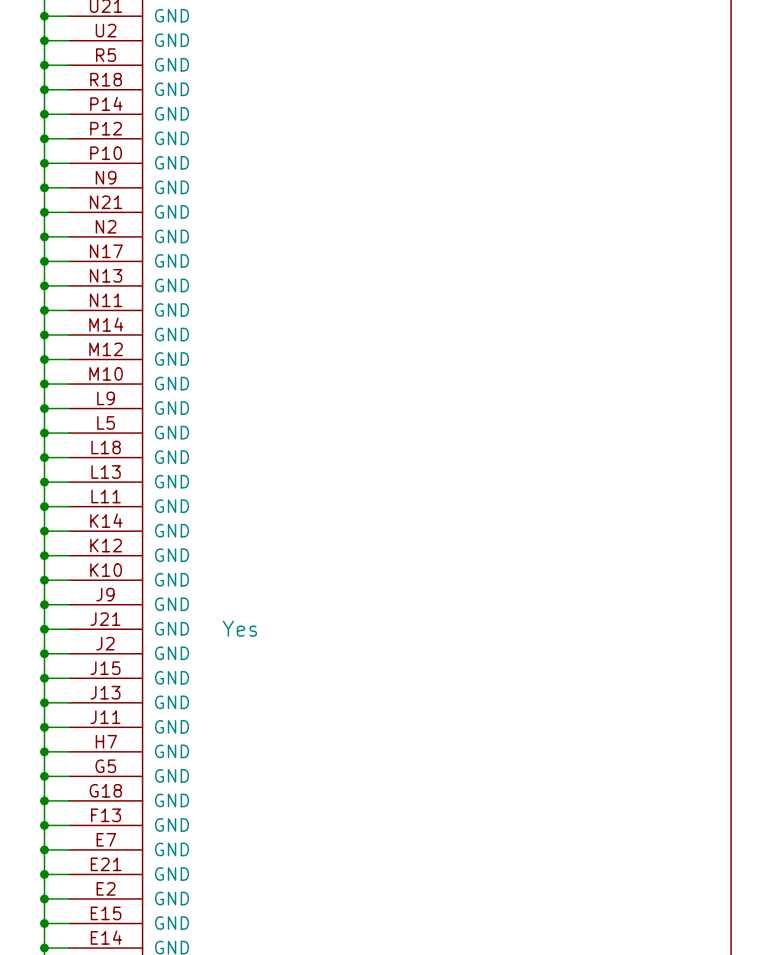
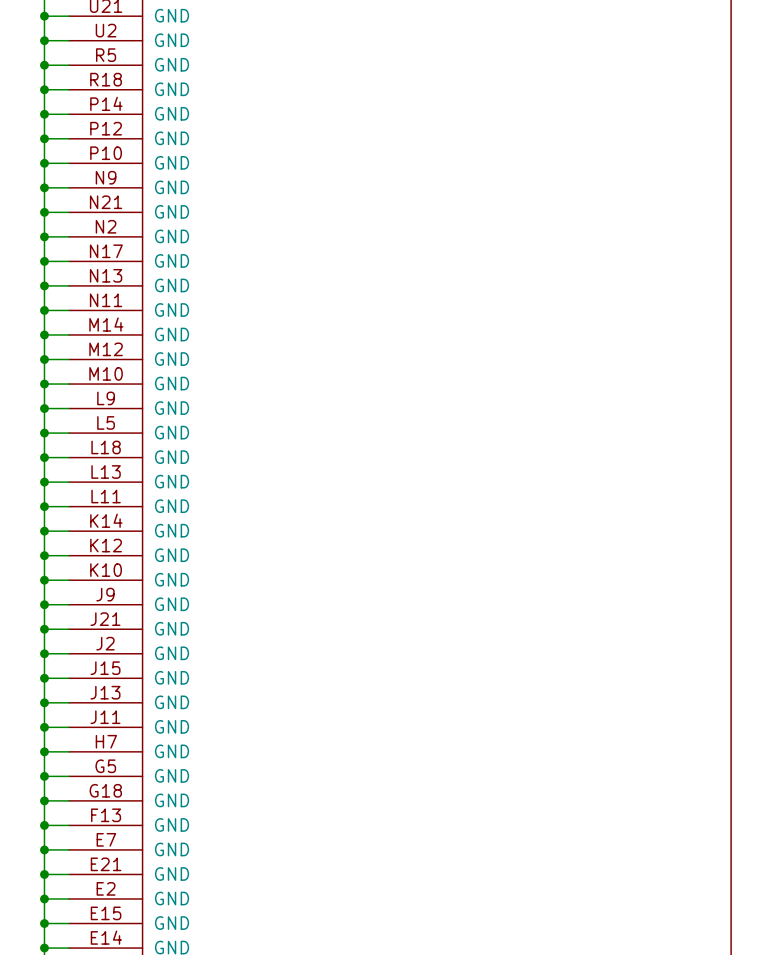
part text: Yes (239, 628) -> none

